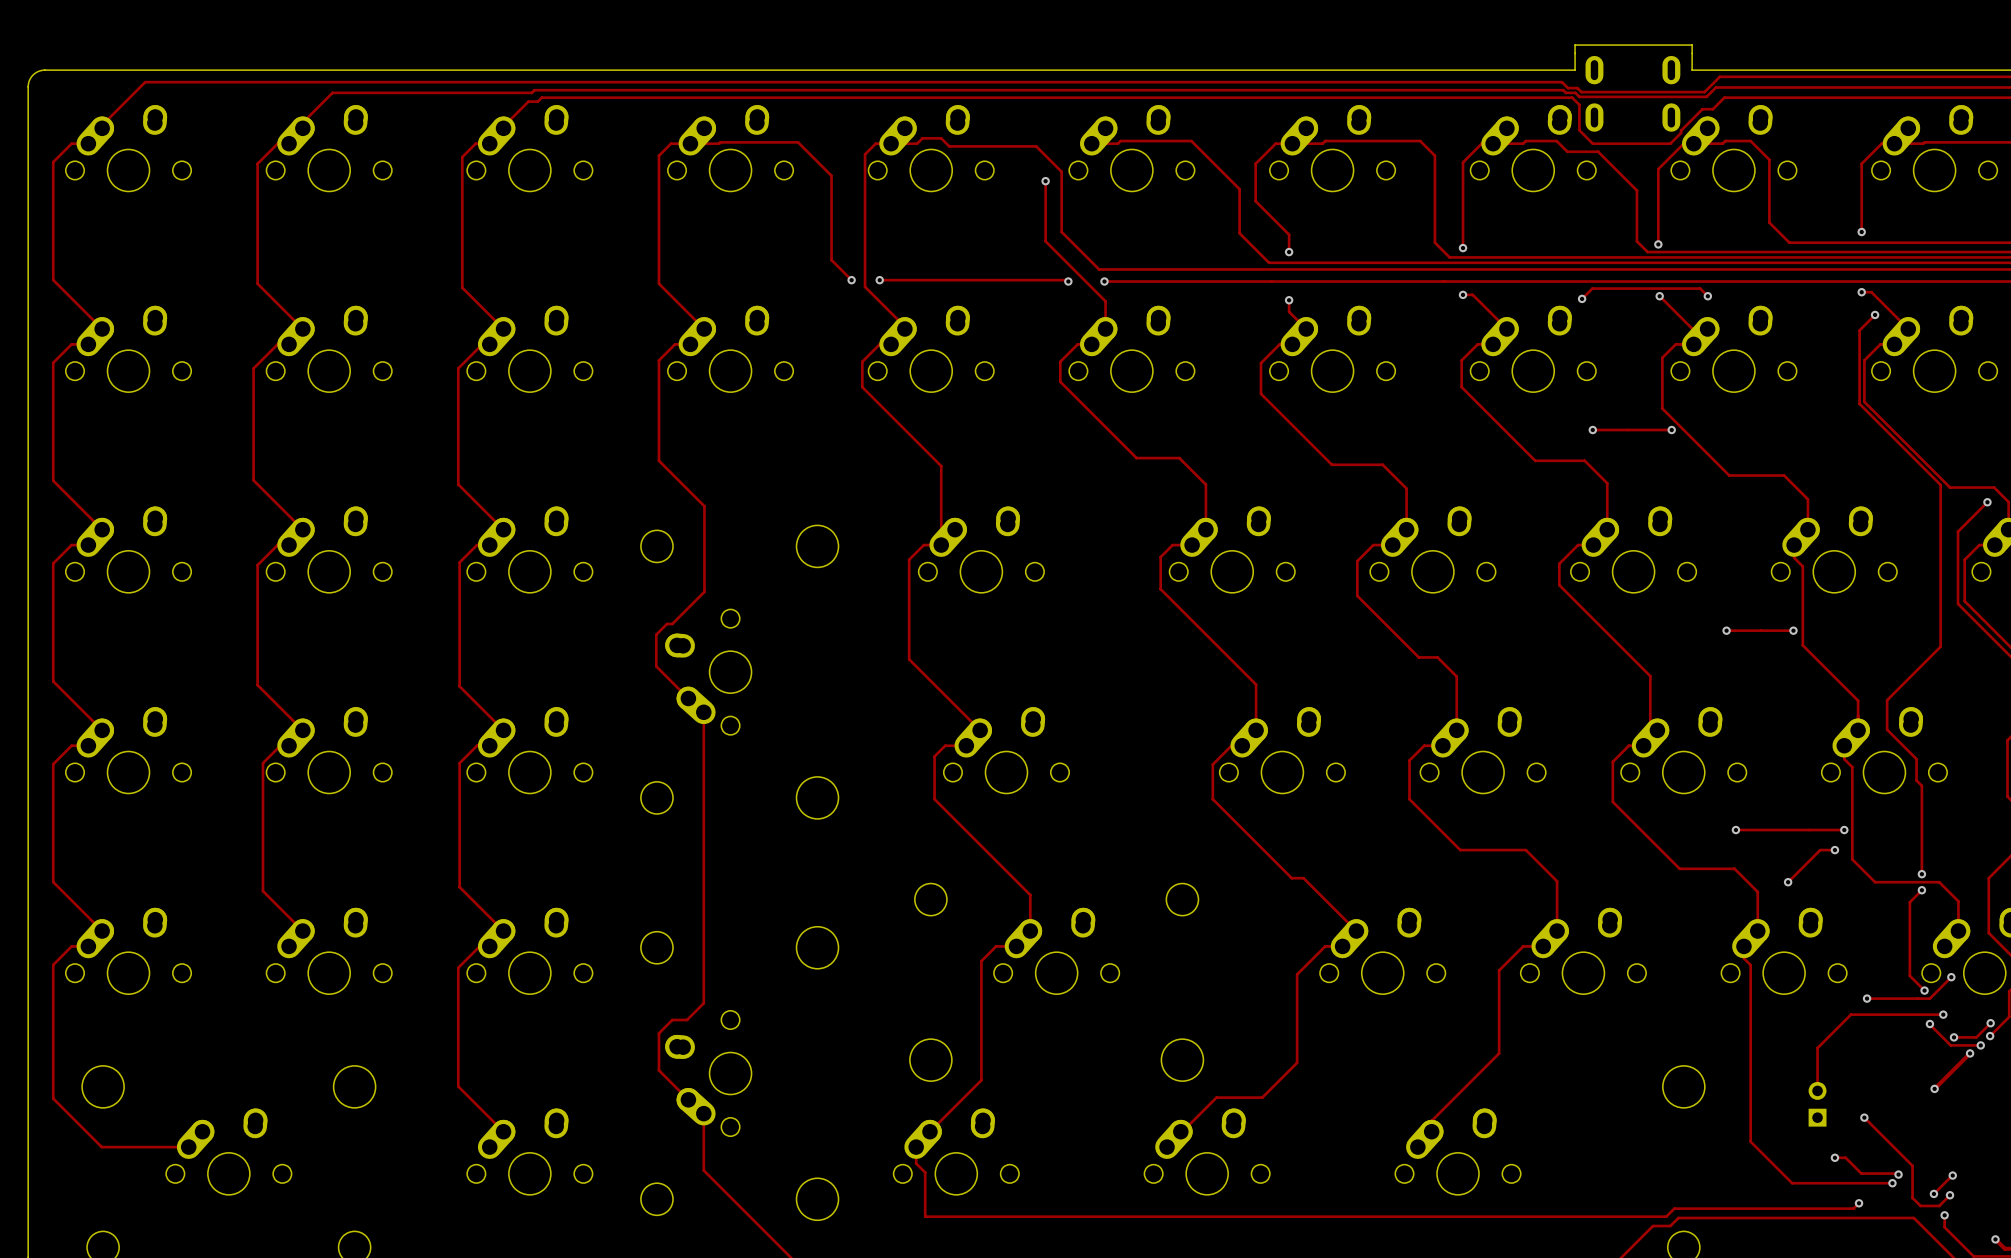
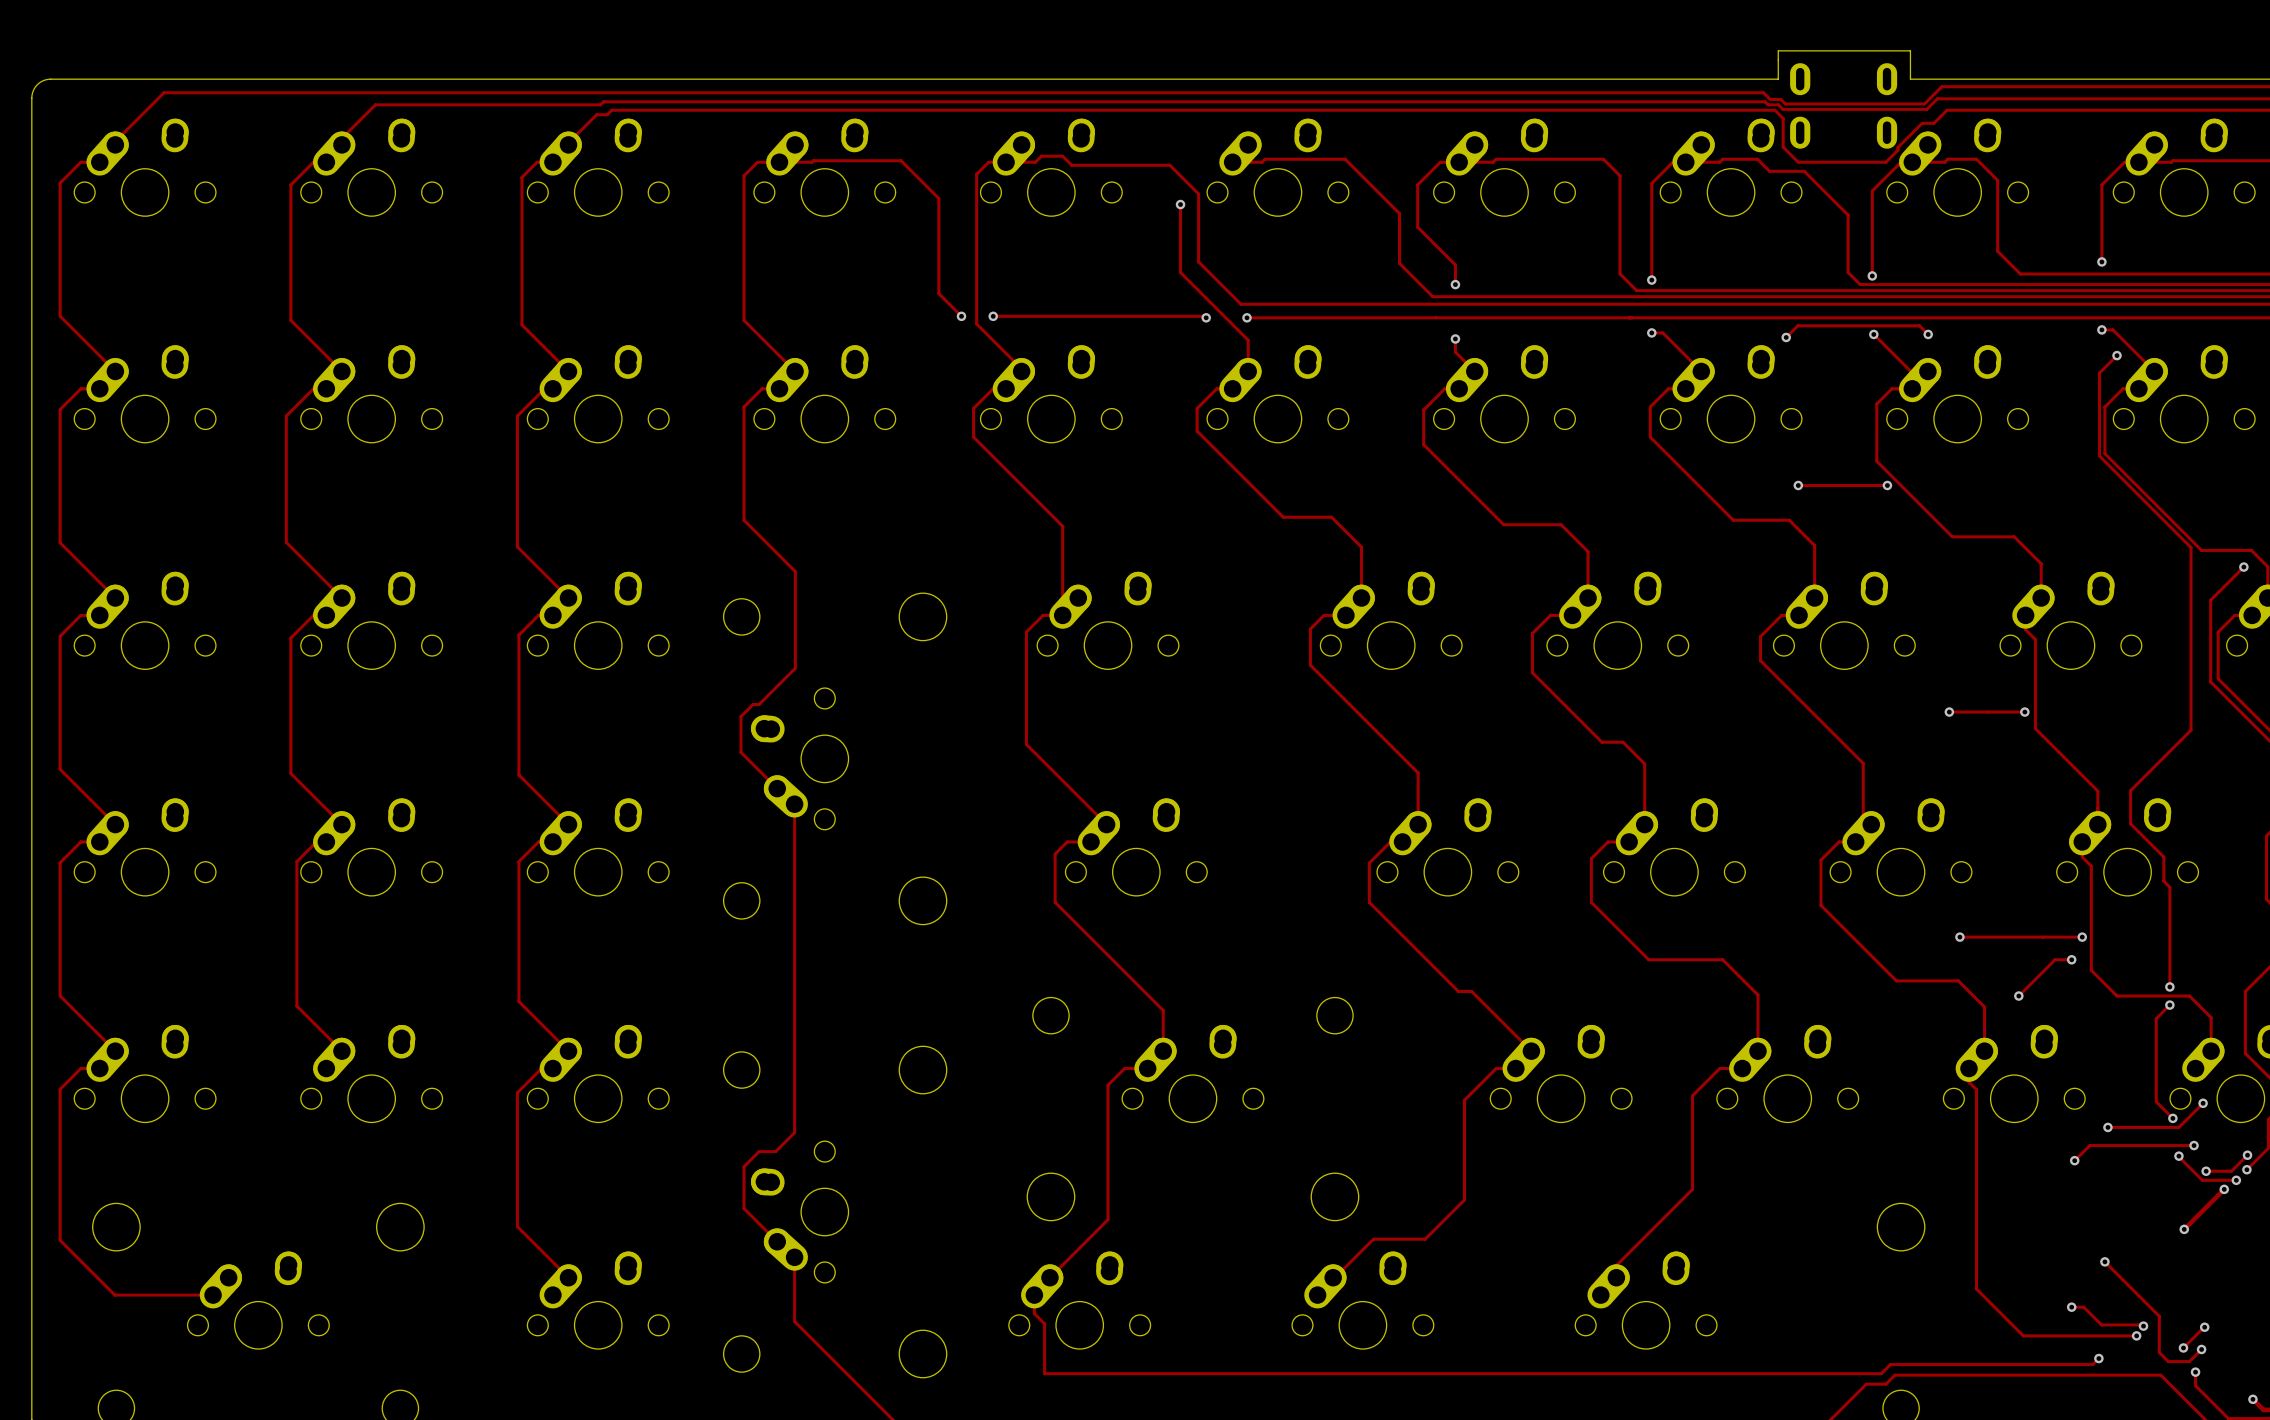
track: (1837, 1028) (1817, 1048) (1817, 1090) -> none
via: none -> (2074, 1160)
part: (1817, 1104) -> none

